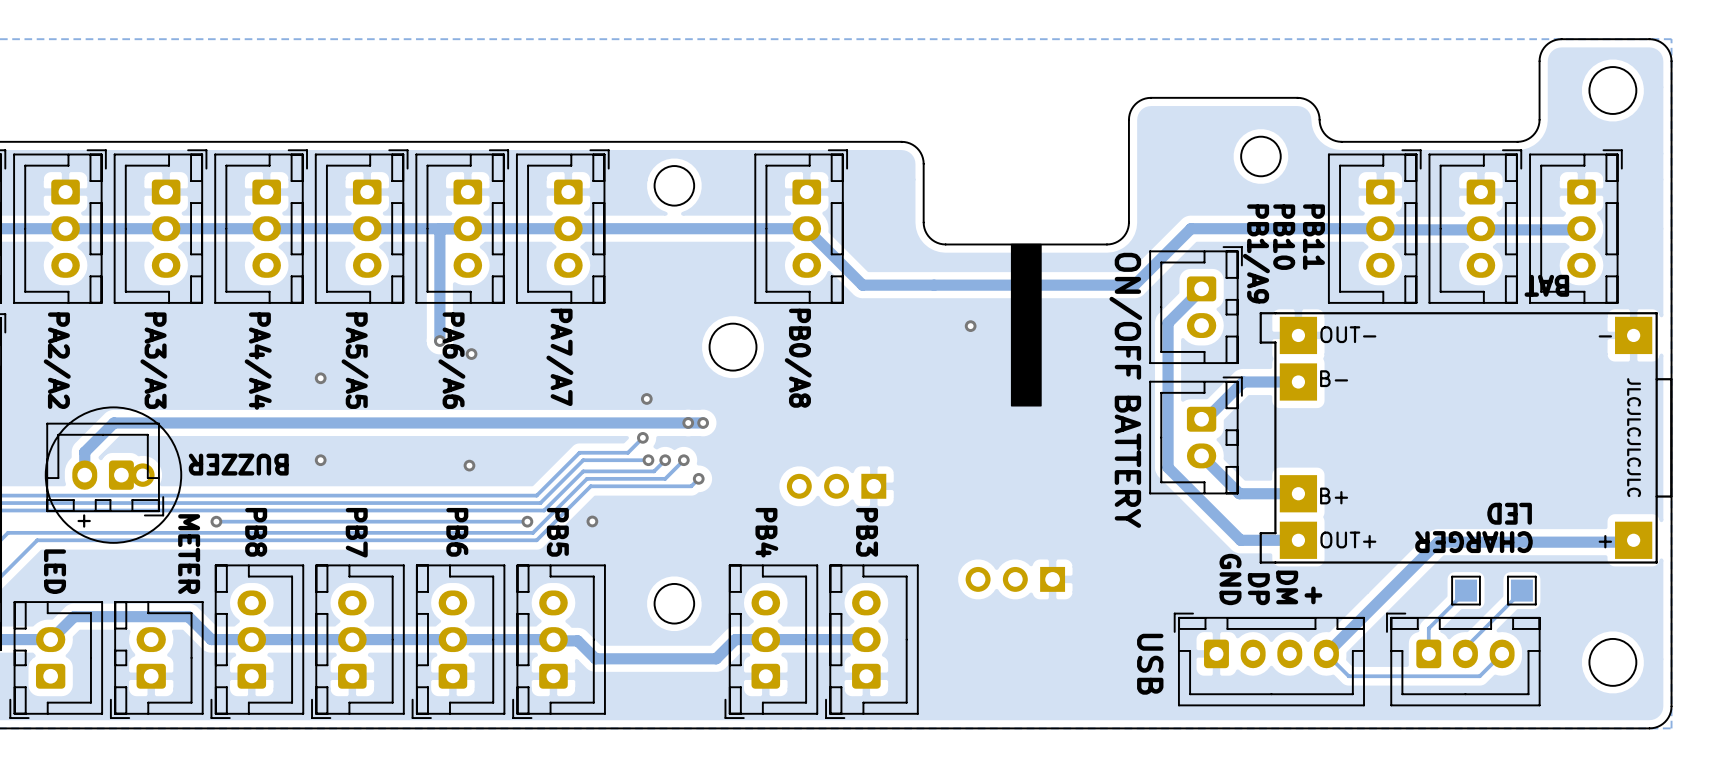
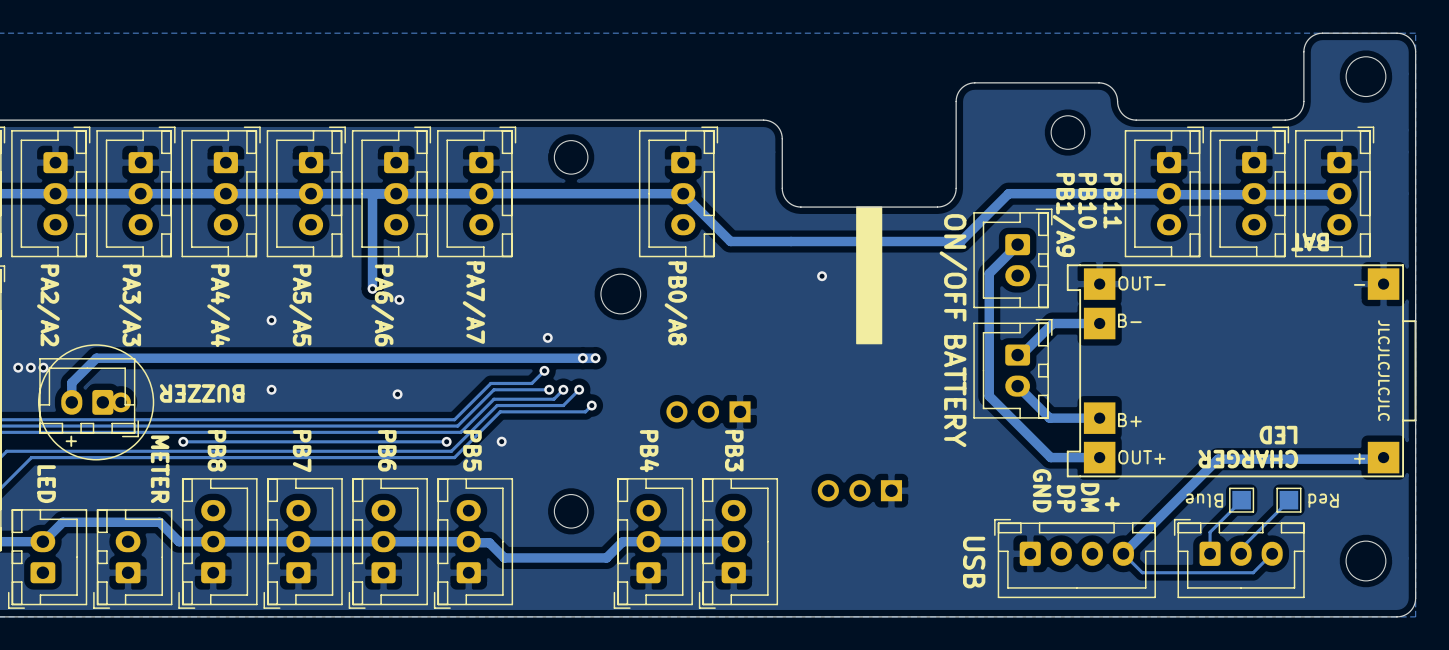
via: none -> (18, 367)
via: none -> (30, 367)
via: none -> (43, 367)
text: none -> Blue (1204, 500)
text: none -> Red (1323, 500)

